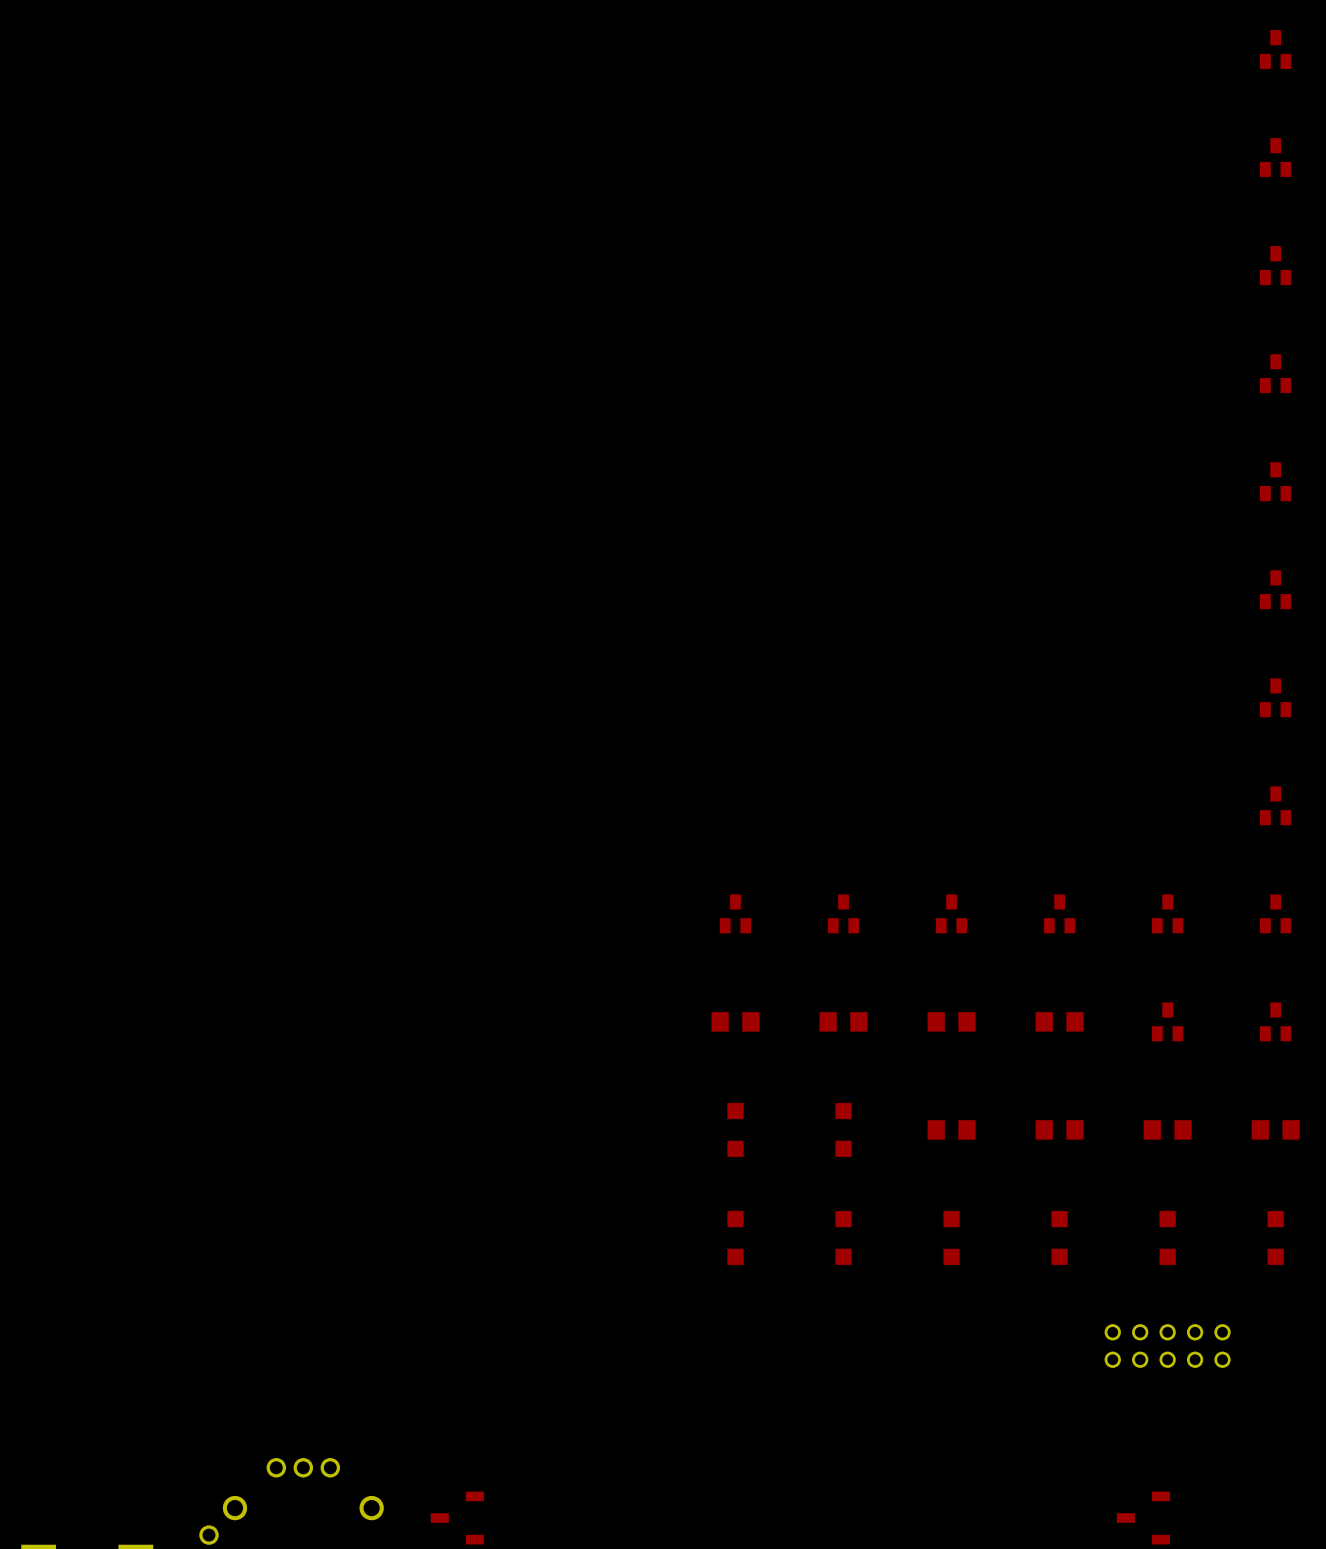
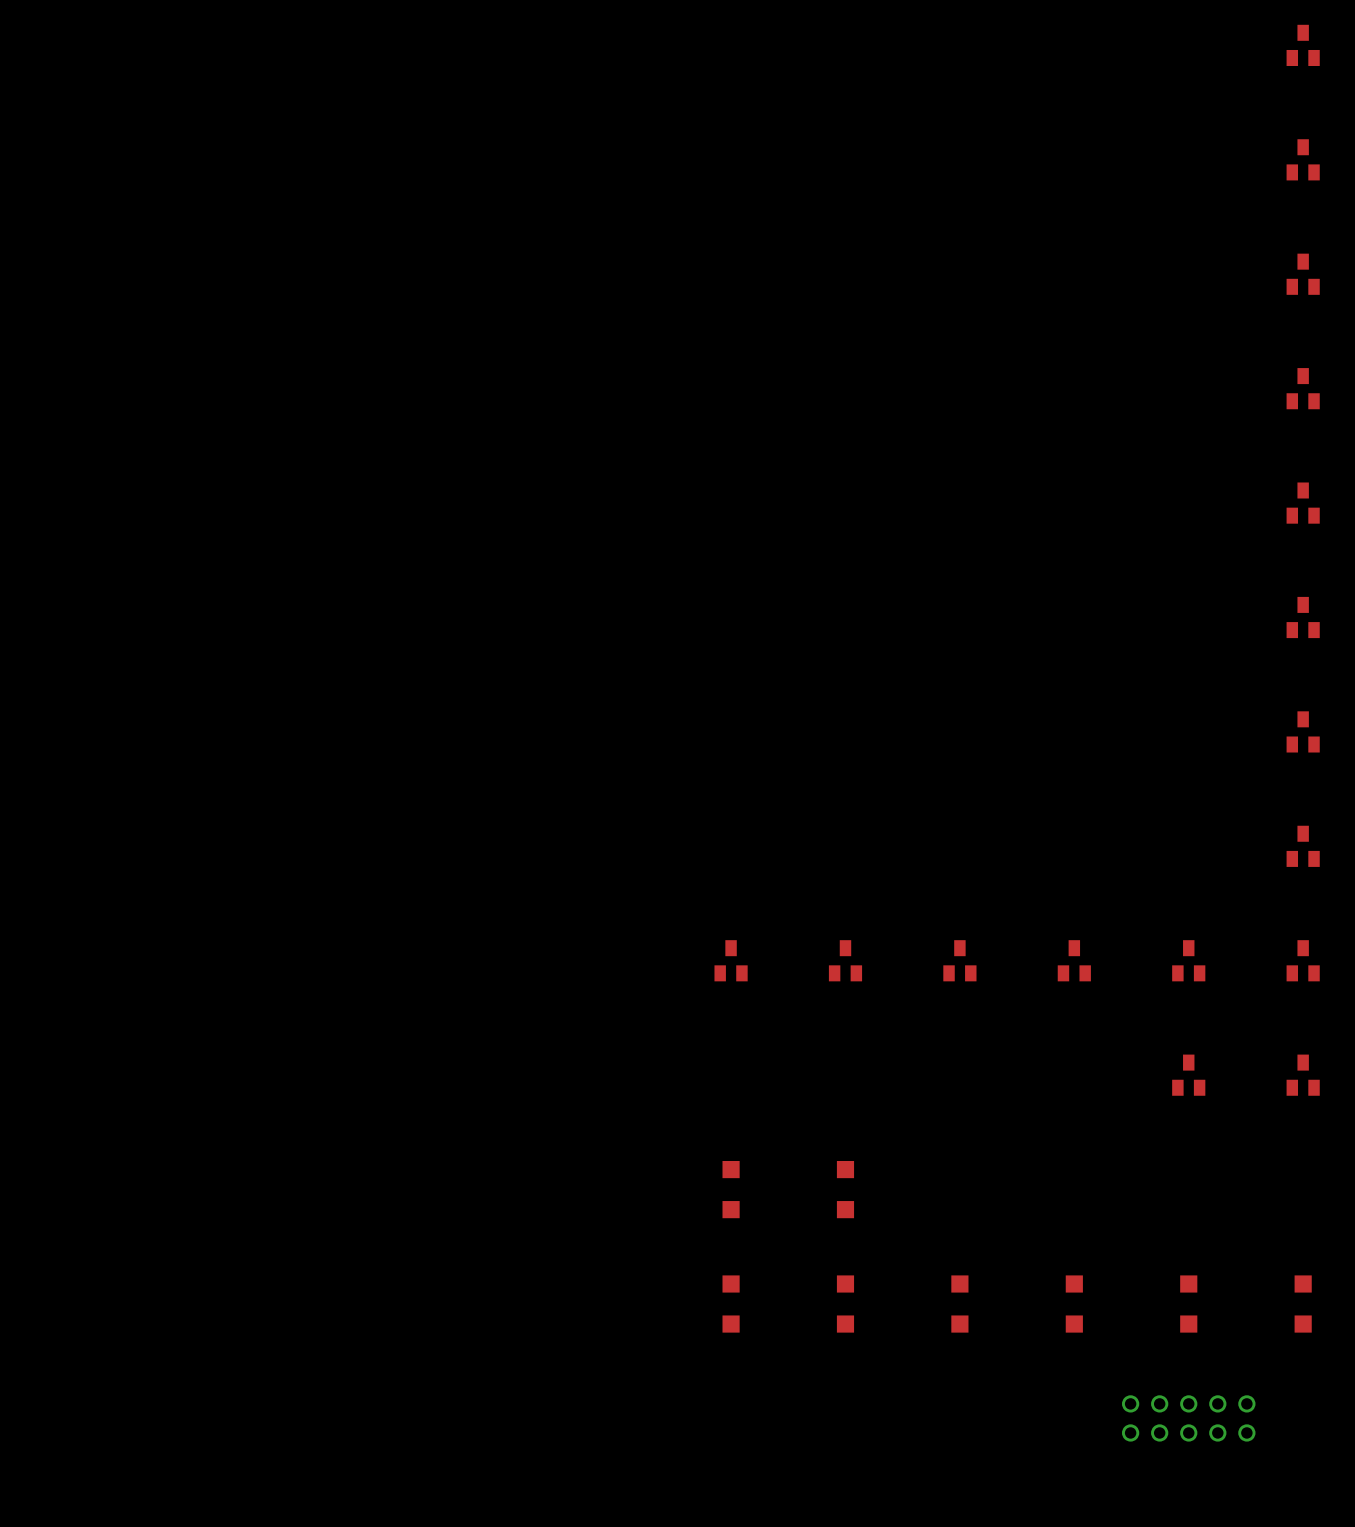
part: (735, 1021) -> none
part: (843, 1021) -> none
part: (951, 1021) -> none
part: (1059, 1021) -> none
part: (951, 1129) -> none
part: (1059, 1129) -> none
part: (1167, 1129) -> none
part: (1275, 1129) -> none

